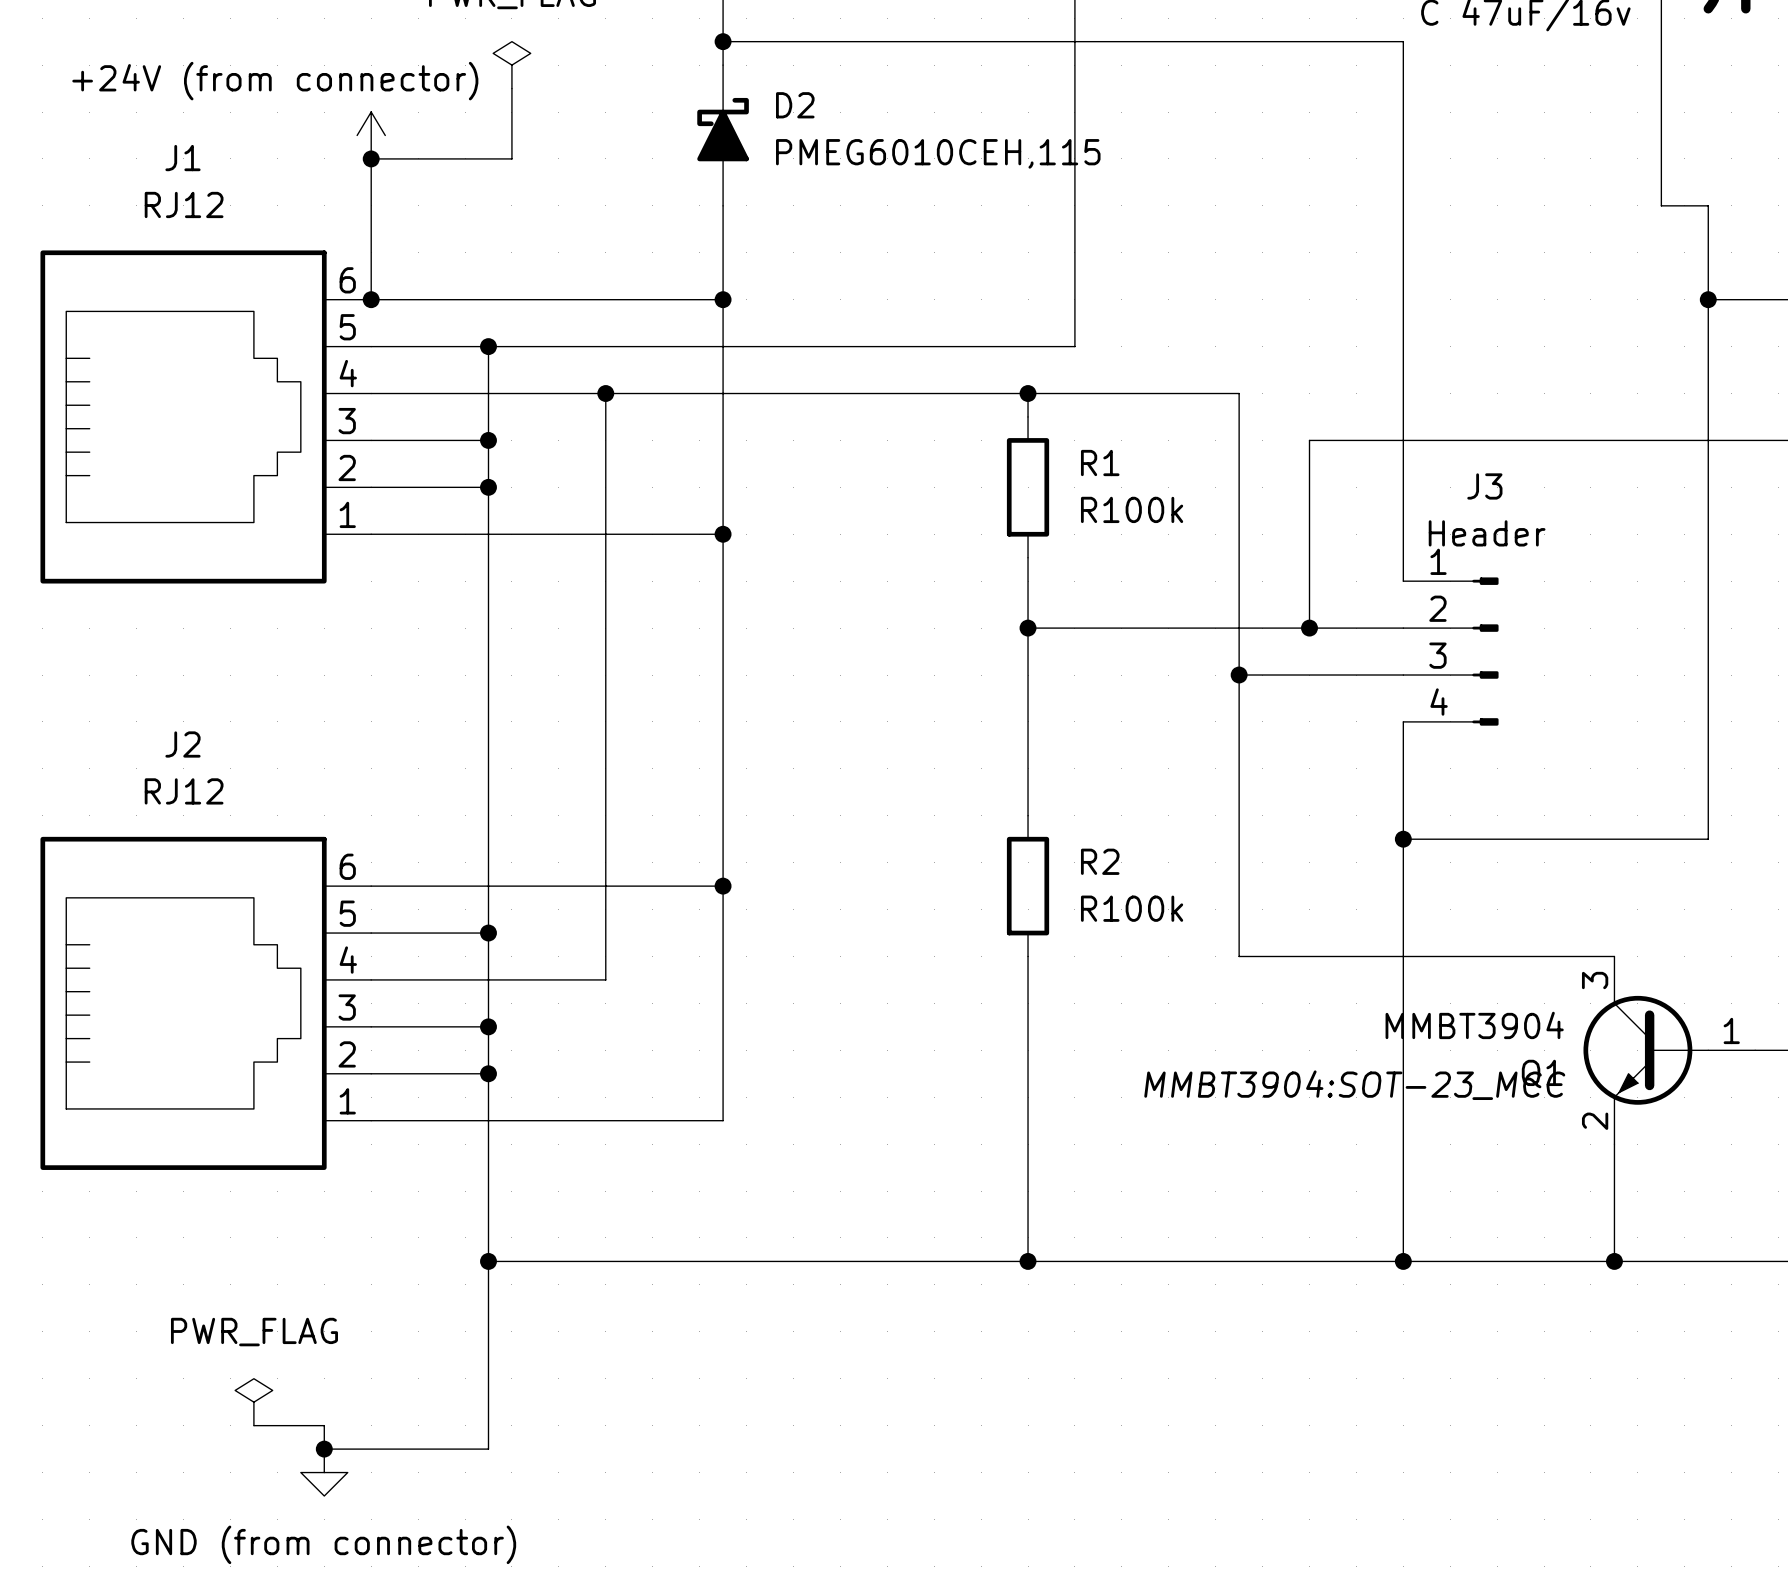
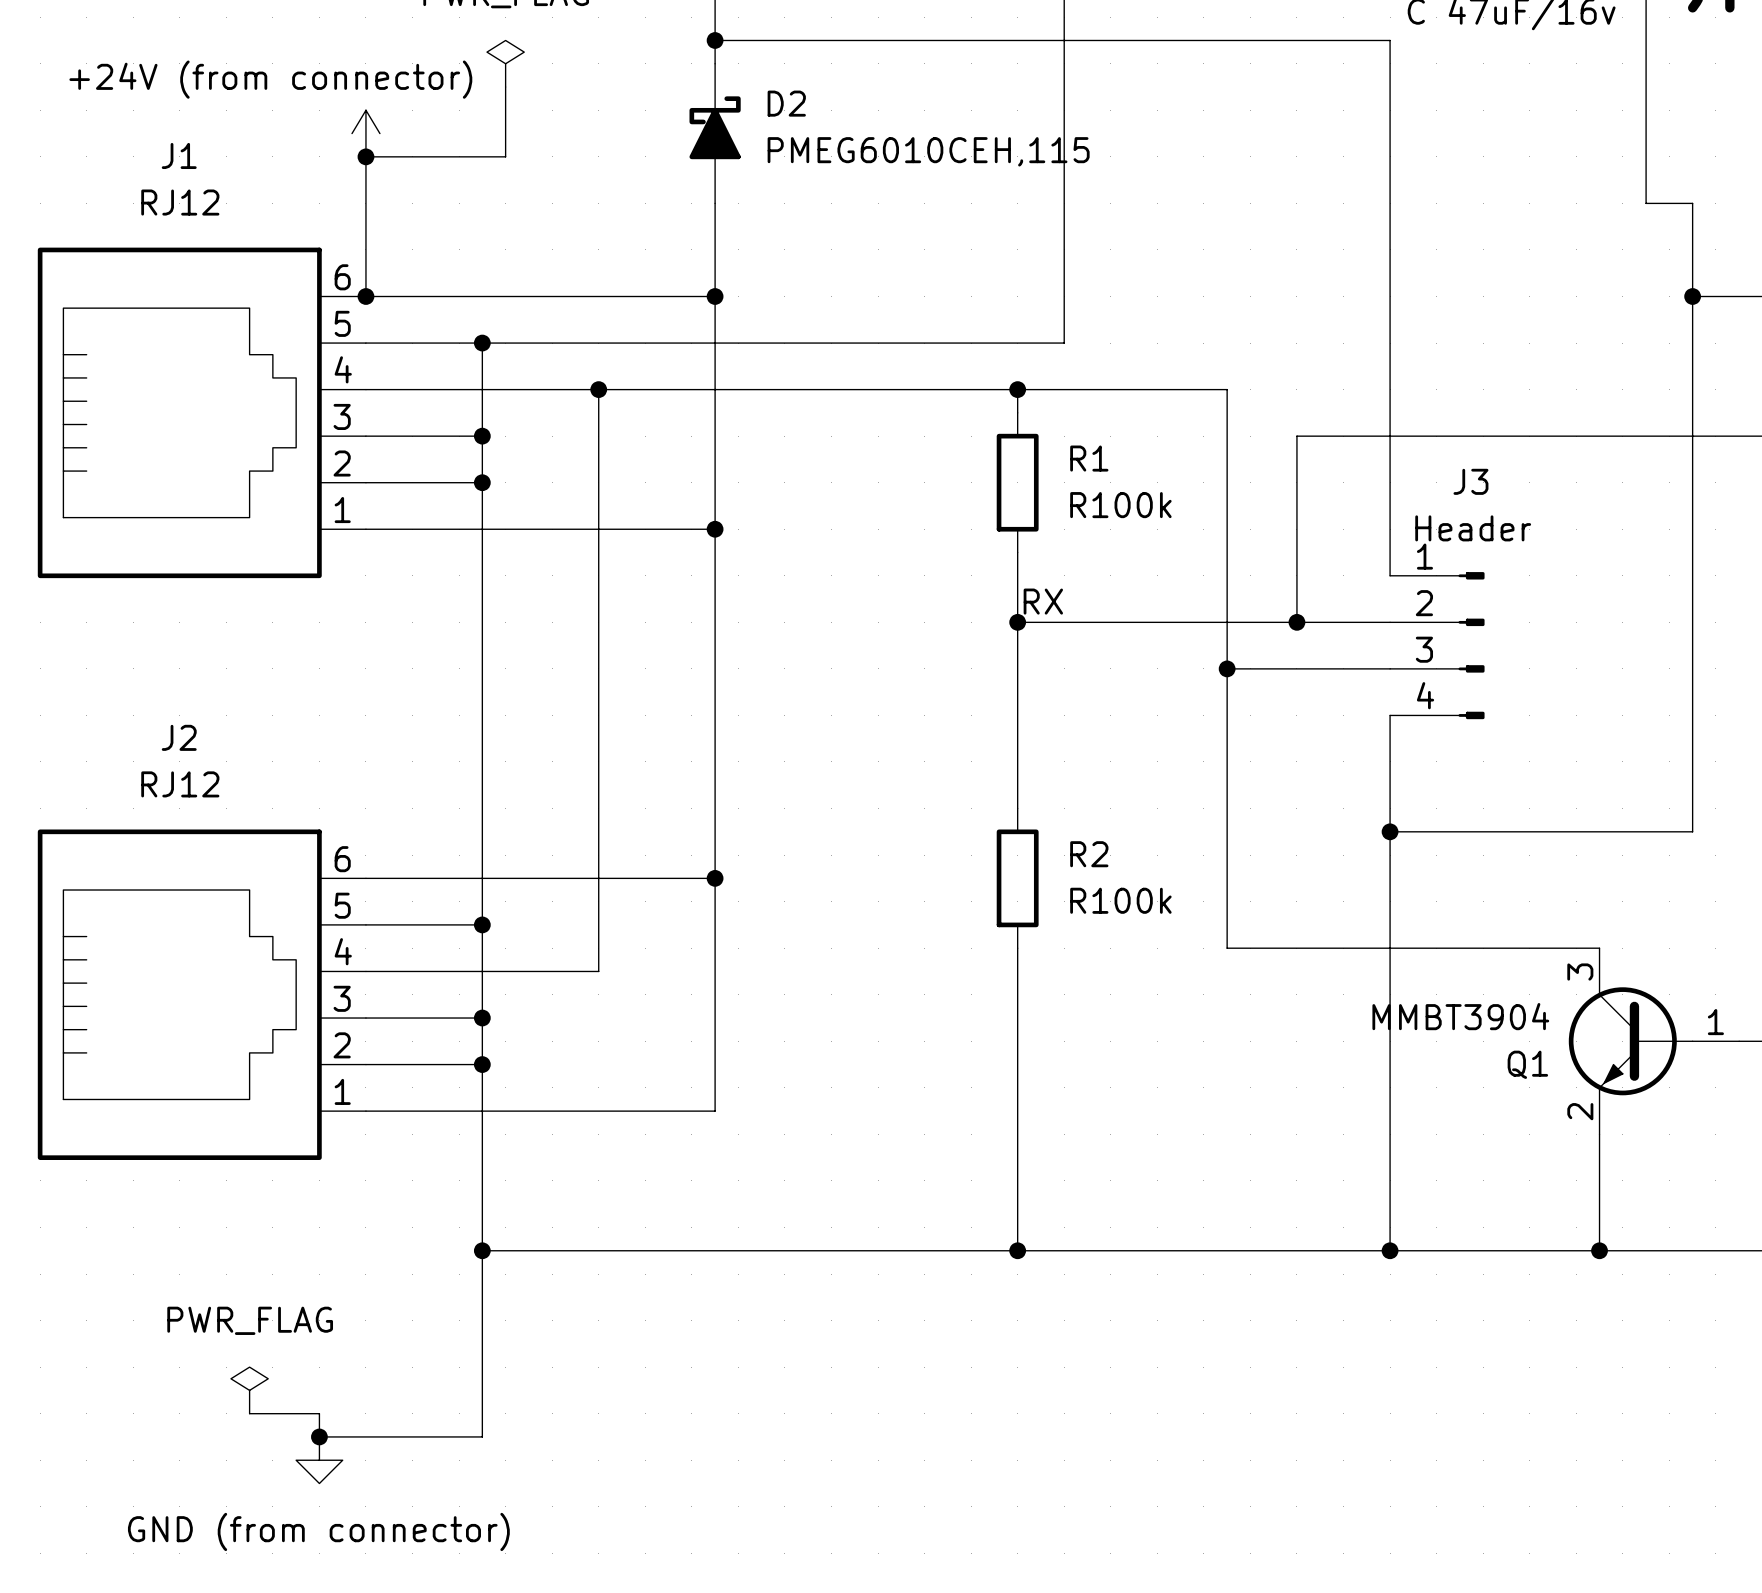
label: none -> RX (1043, 601)
Q1 text: MMBT3904:SOT-23_MCC (1354, 1085) -> none

